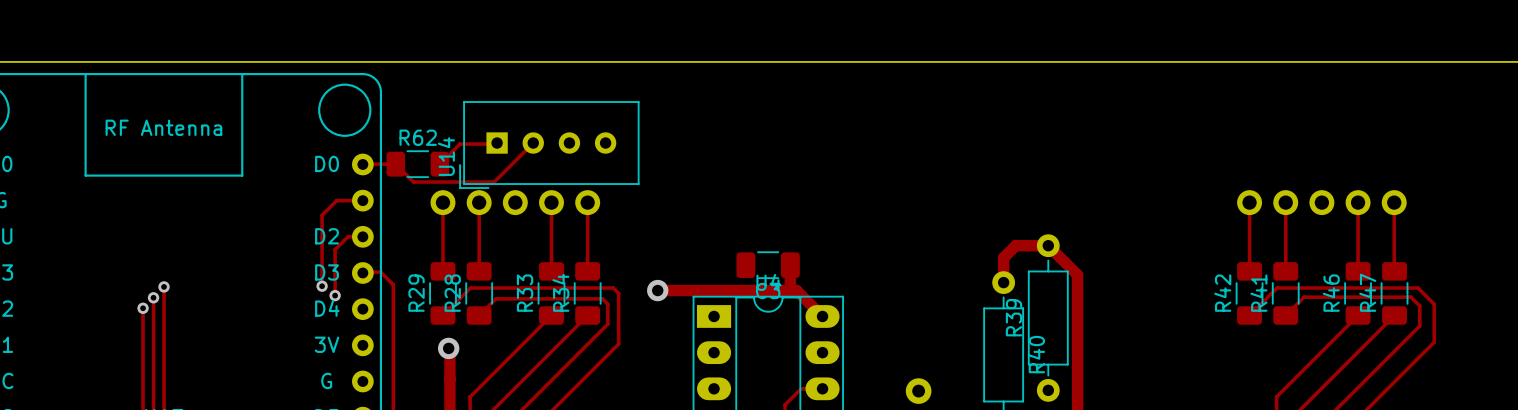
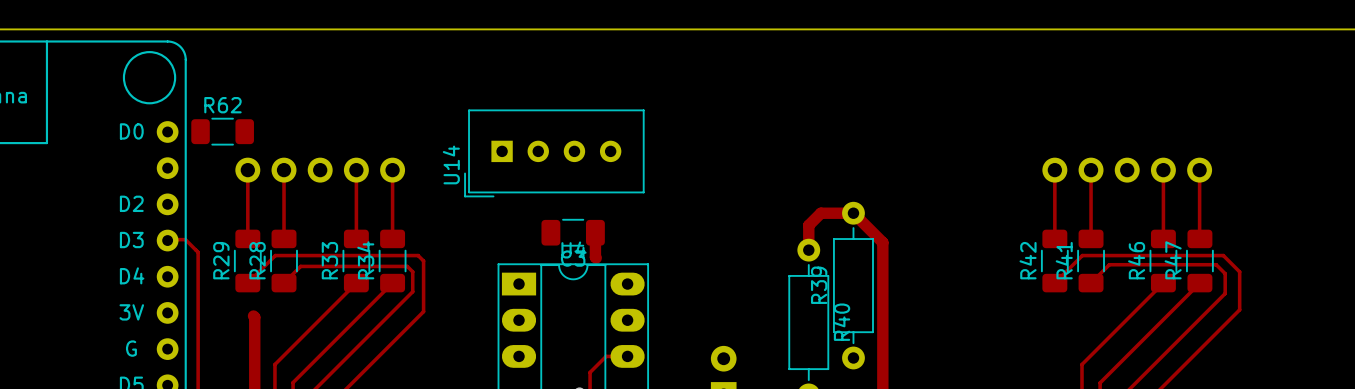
track: (497, 143) (460, 144) (439, 164) -> none
track: (533, 143) (494, 182) (413, 182) (395, 164) (362, 164) -> none
U14 position: (549, 145) -> (554, 153)
track: (362, 200) (336, 200) (322, 215) (322, 286) -> none
track: (362, 236) (347, 236) (335, 249) (335, 295) -> none
via: (322, 286) -> none
track: (657, 290) (796, 290) (822, 316) -> none
via: (657, 290) -> none
via: (335, 295) -> none
via: (448, 348) -> none

